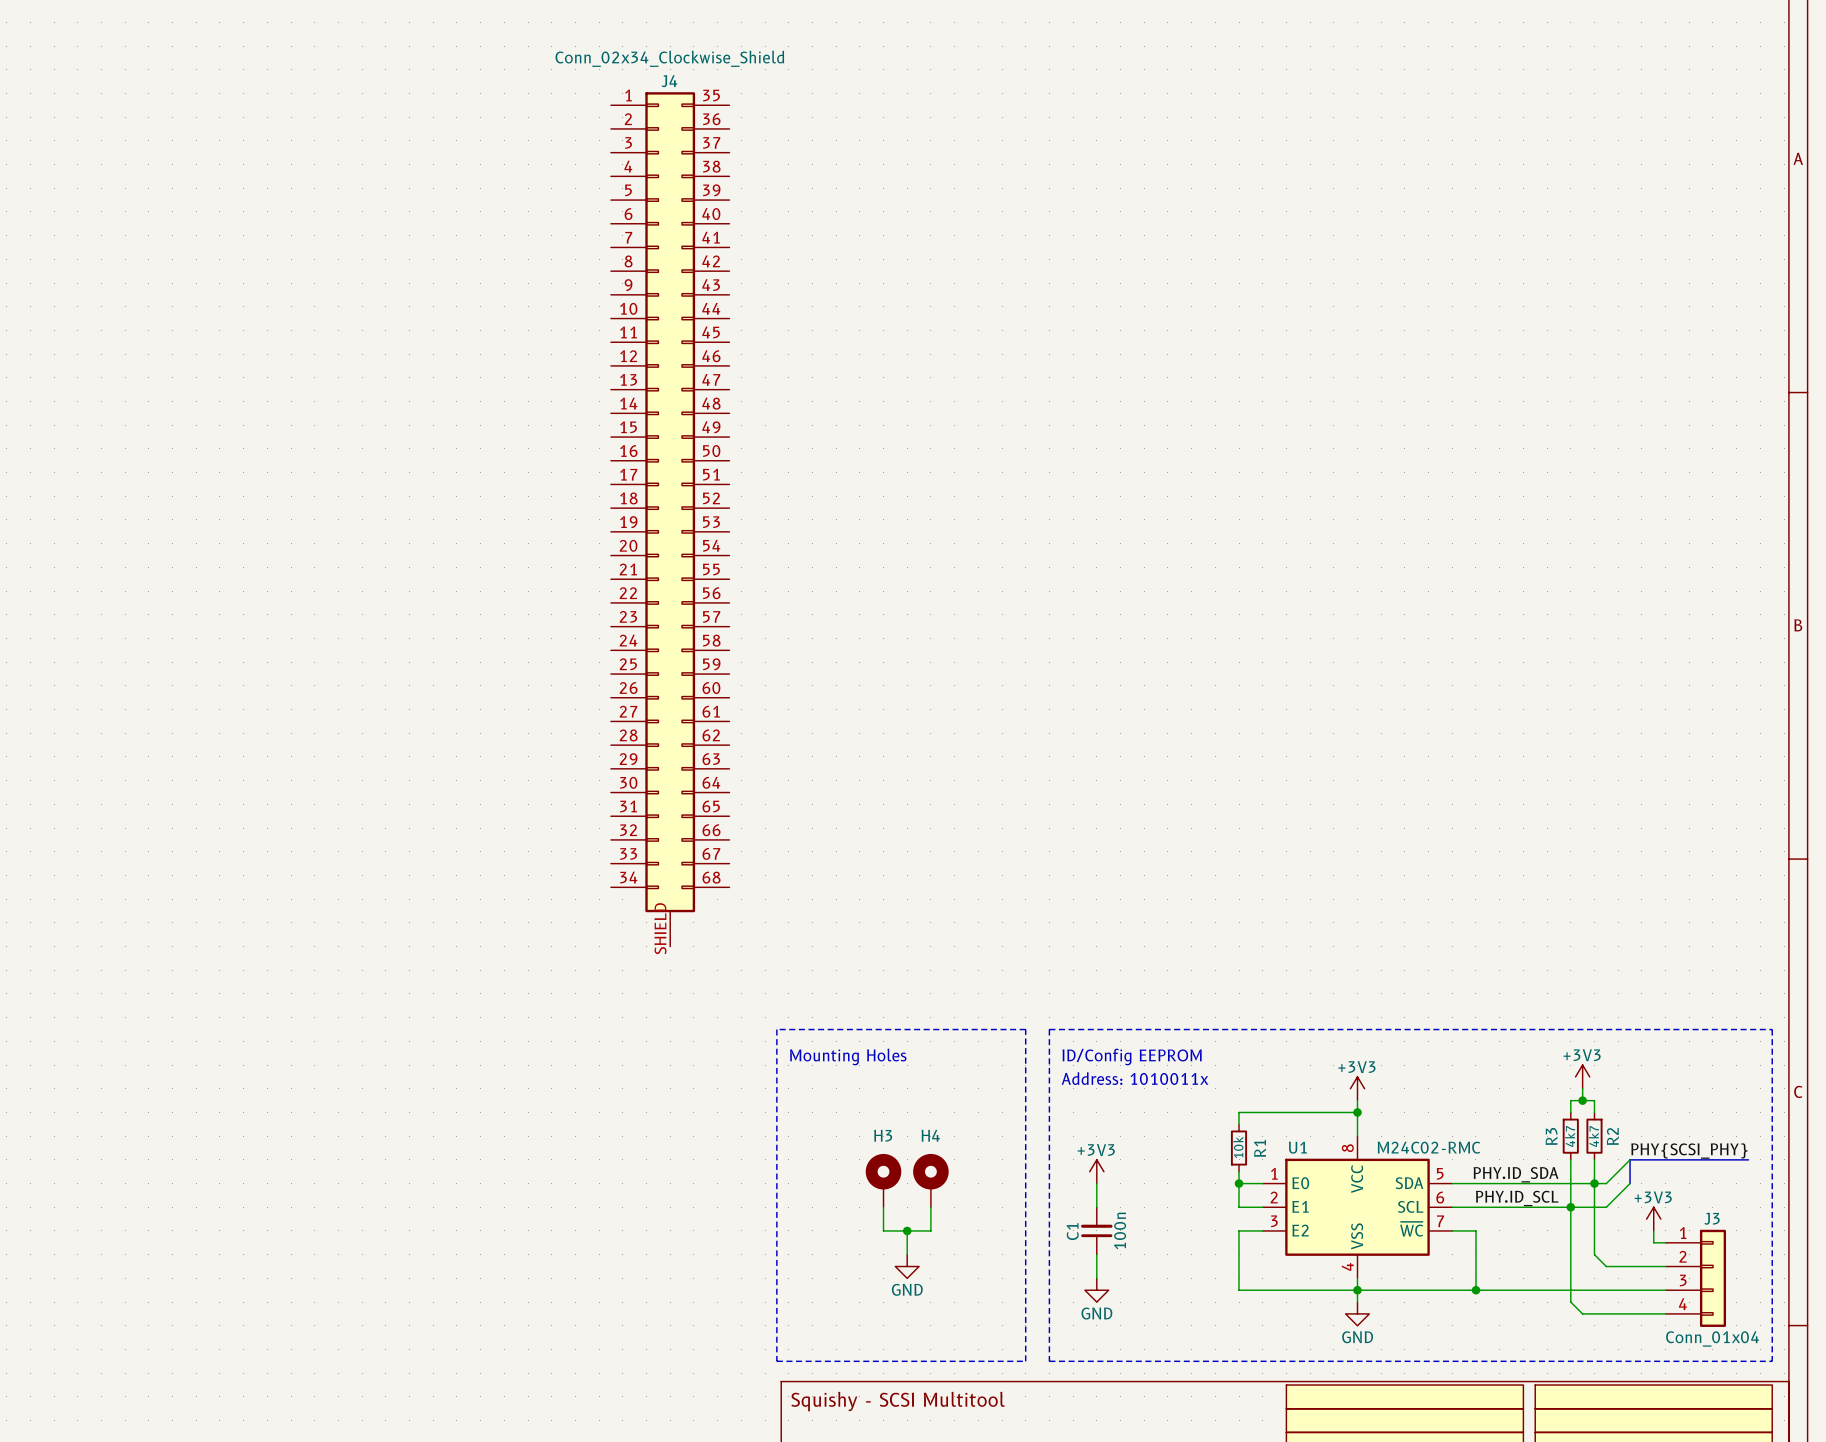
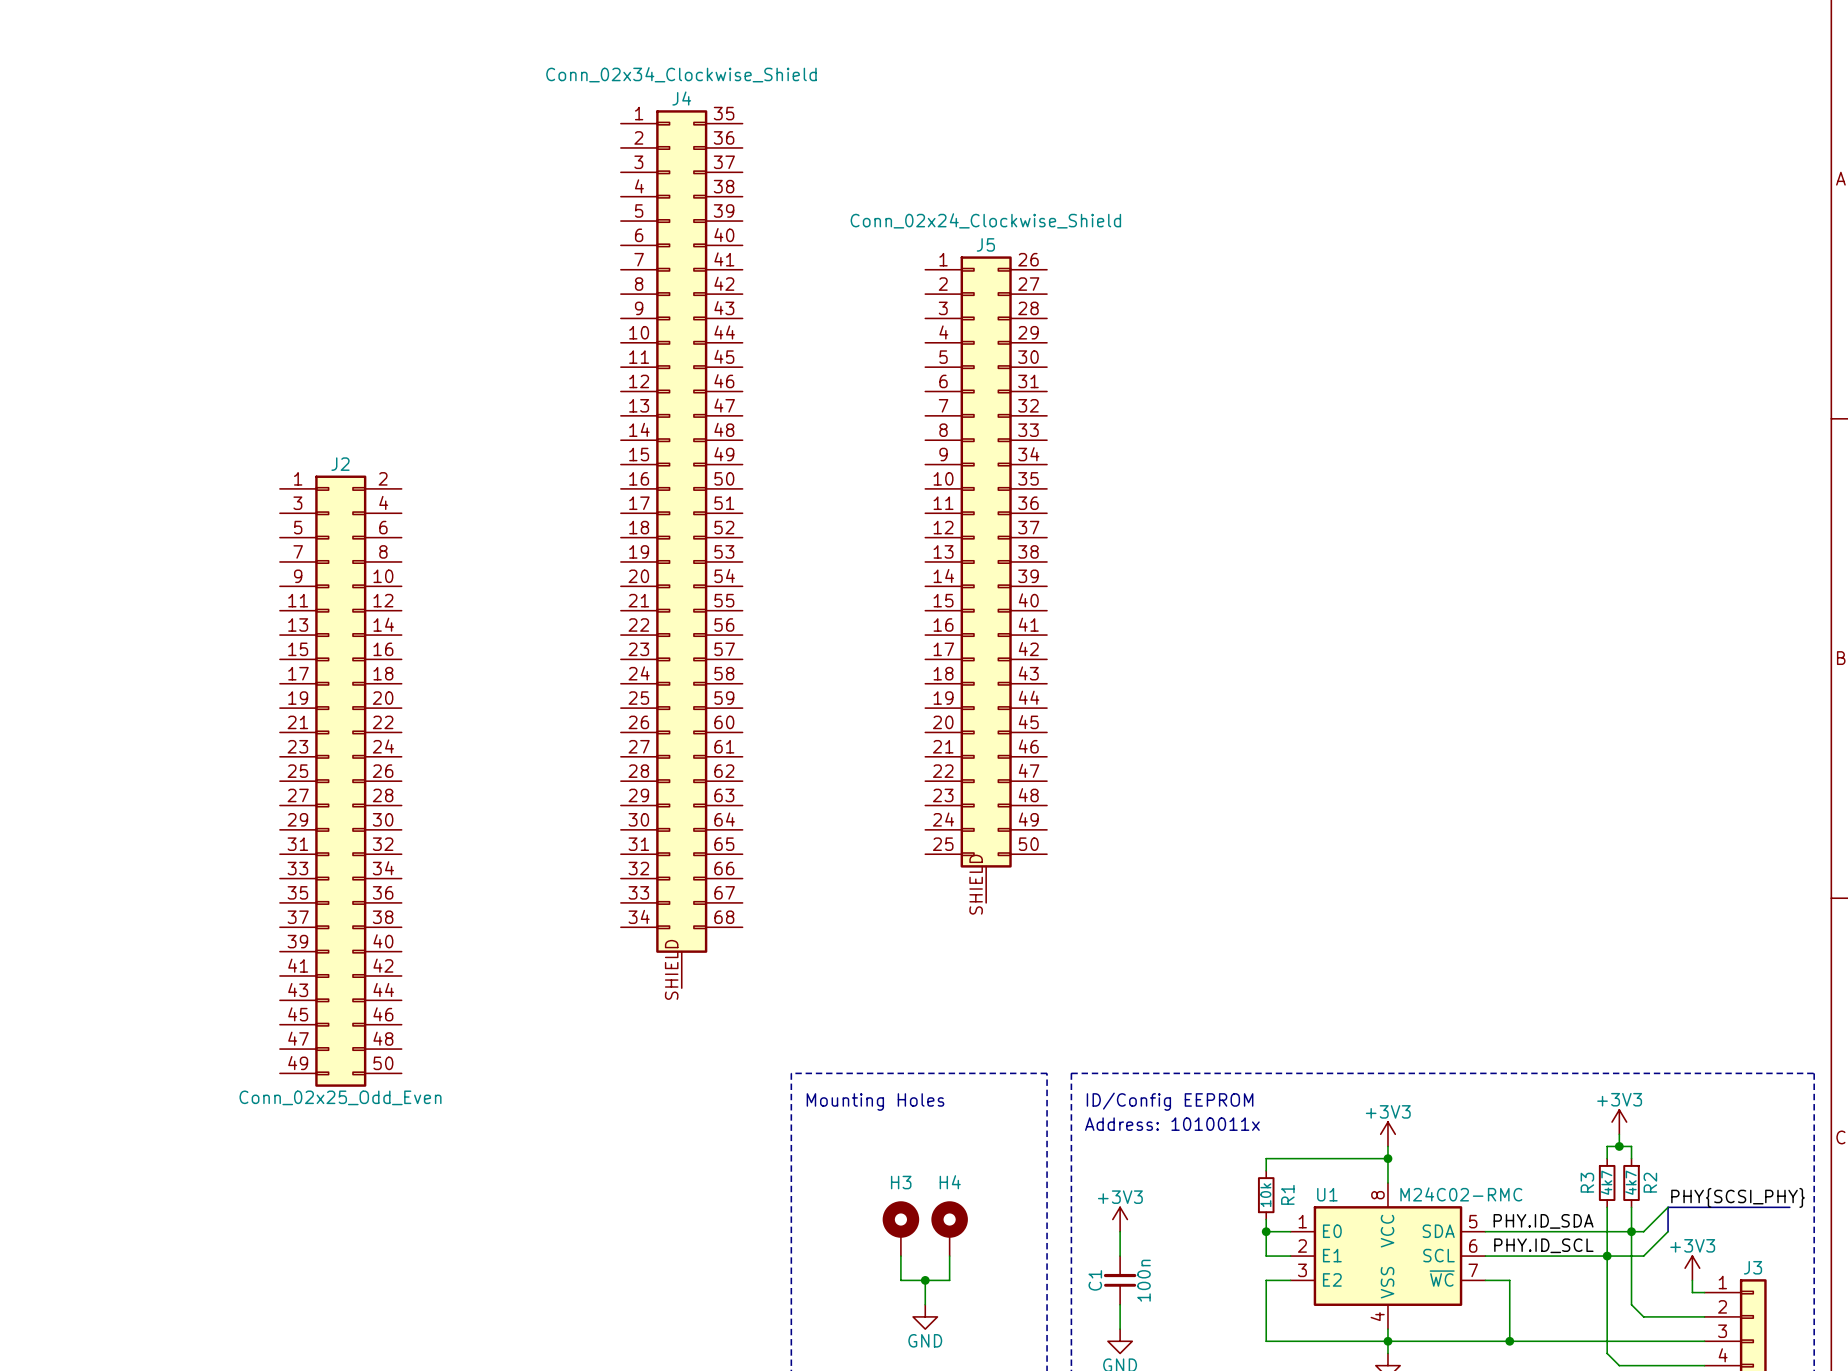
J5: none -> Conn_02x24_Clockwise_Shield (986, 579)
J2: none -> Conn_02x25_Odd_Even (340, 781)

